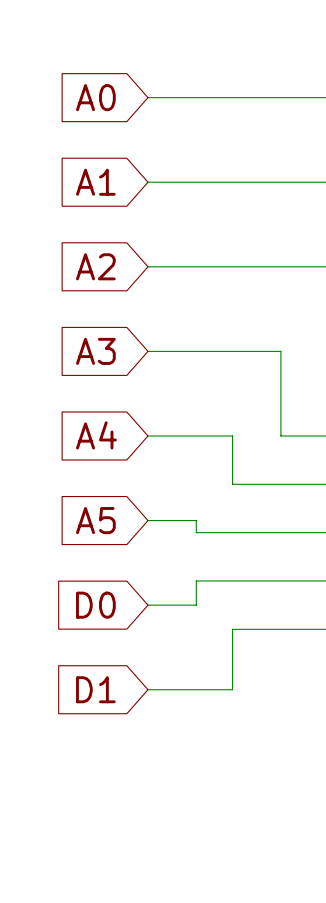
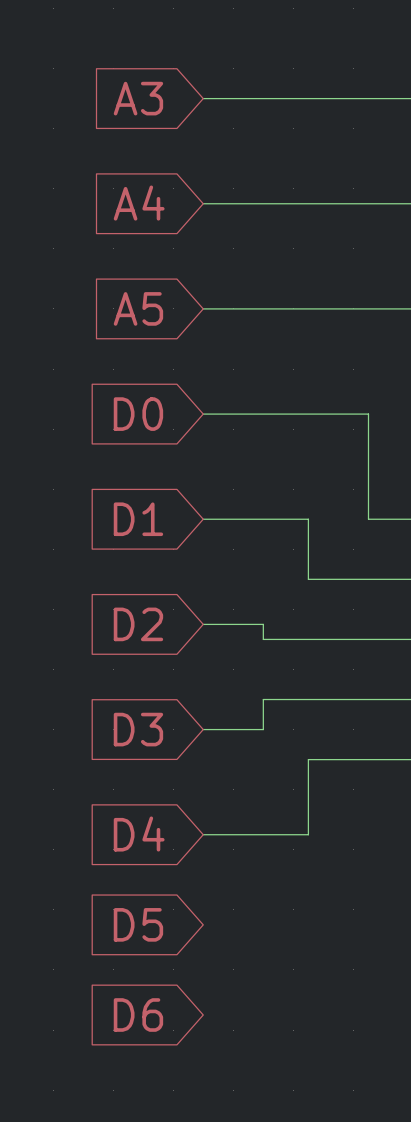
global label: A0 (95, 97) -> A3 (138, 98)
global label: A1 (95, 182) -> A4 (139, 203)
global label: A2 (95, 266) -> A5 (138, 308)
global label: A3 (95, 351) -> D0 (138, 414)
global label: A4 (96, 435) -> D1 (138, 519)
global label: A5 (95, 520) -> D2 (138, 624)
global label: D0 (95, 605) -> D3 (138, 729)
global label: D1 (95, 689) -> D4 (139, 834)
global label: none -> D5 (138, 924)
global label: none -> D6 (138, 1015)

